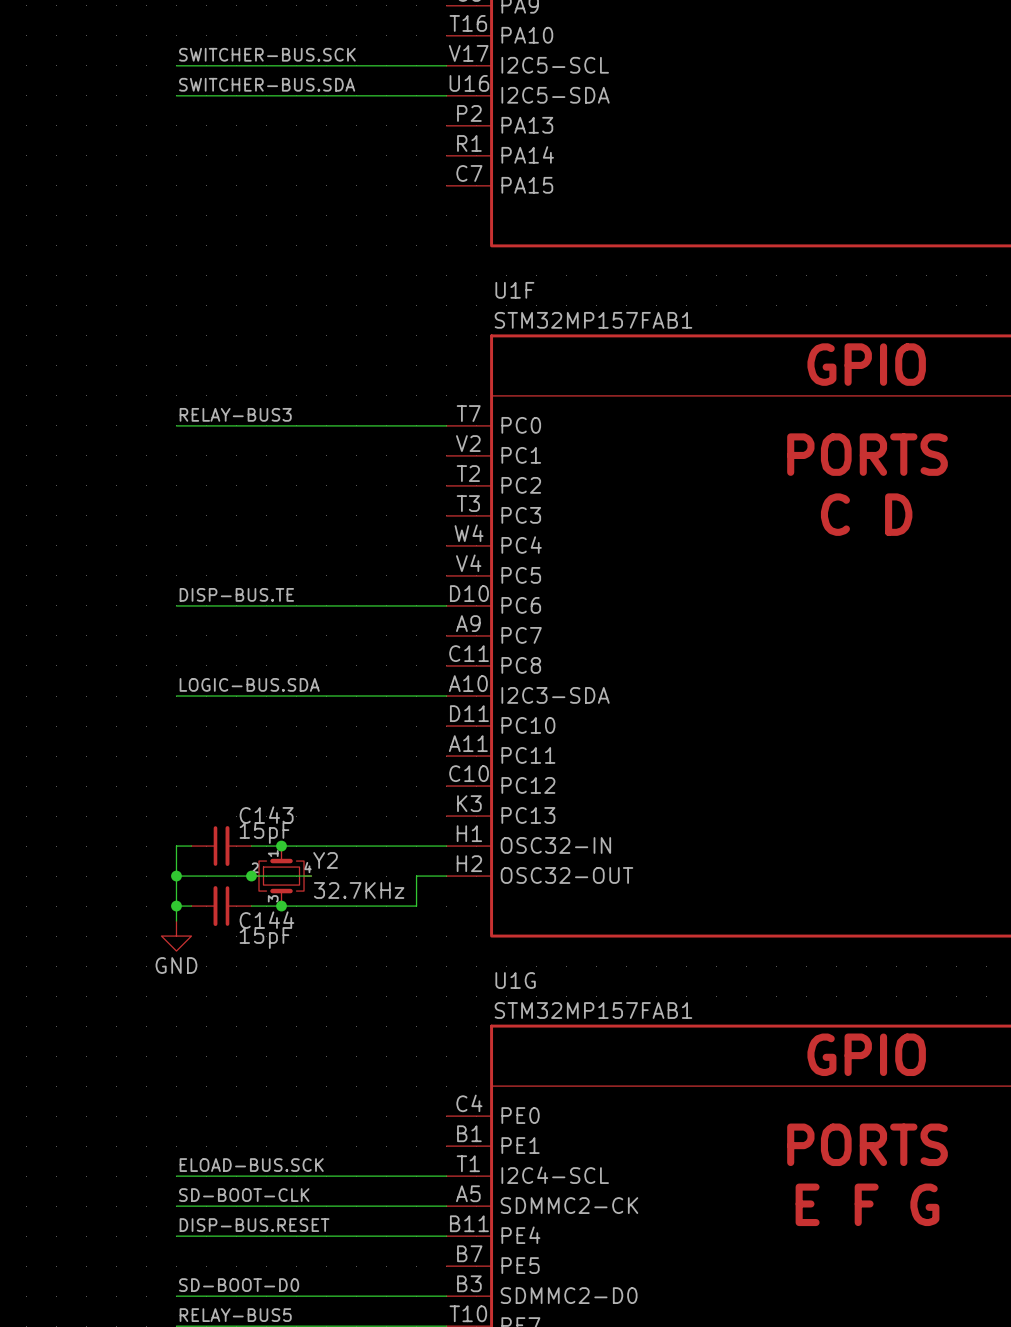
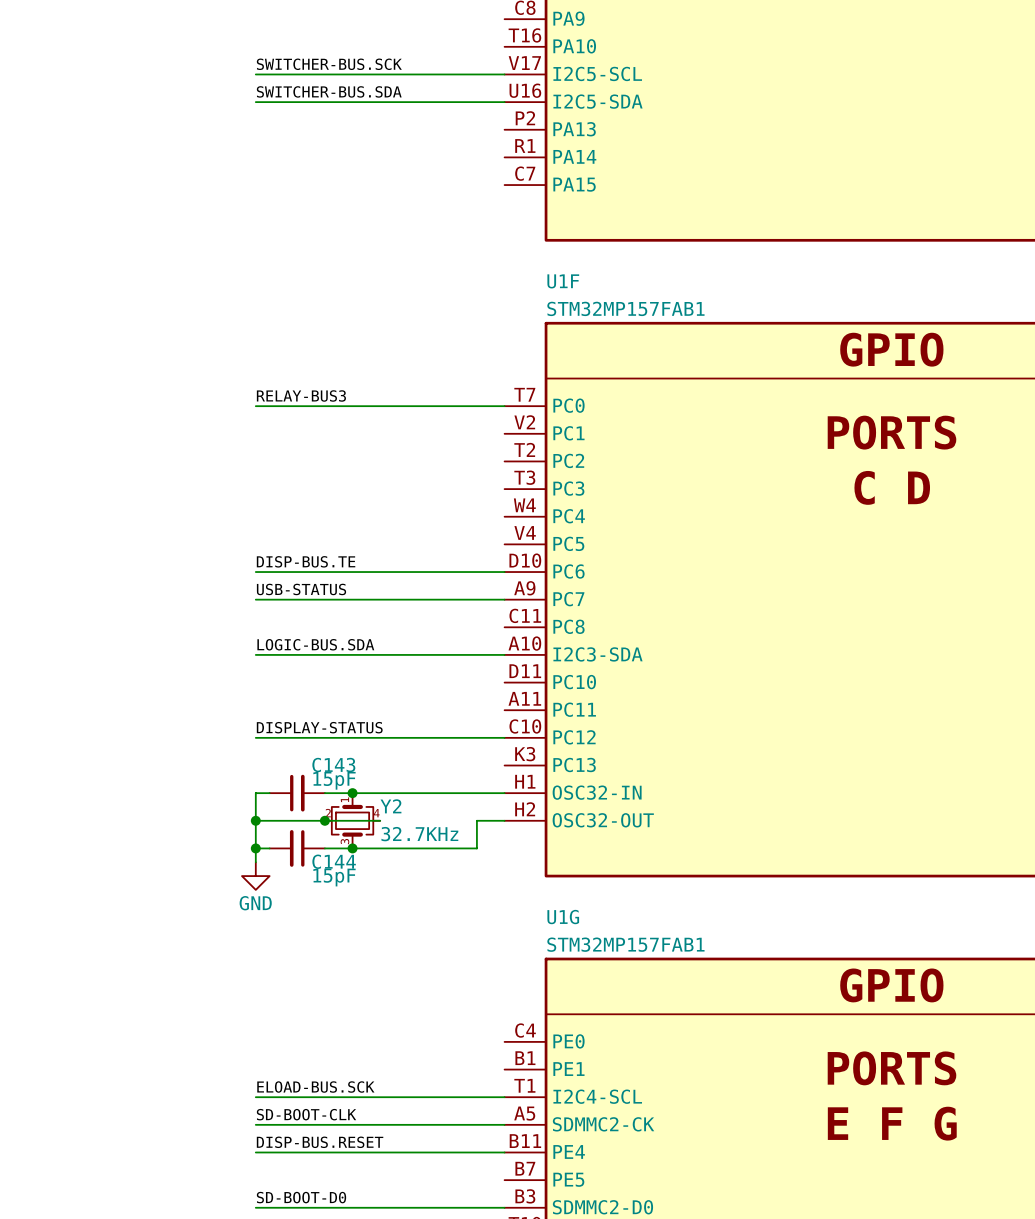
label: none -> USB-STATUS (301, 589)
wire: none -> (255, 599) (504, 599)
label: none -> DISPLAY-STATUS (319, 727)
wire: none -> (255, 737) (504, 737)

